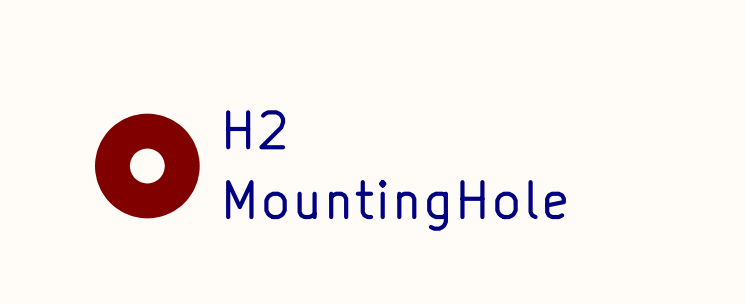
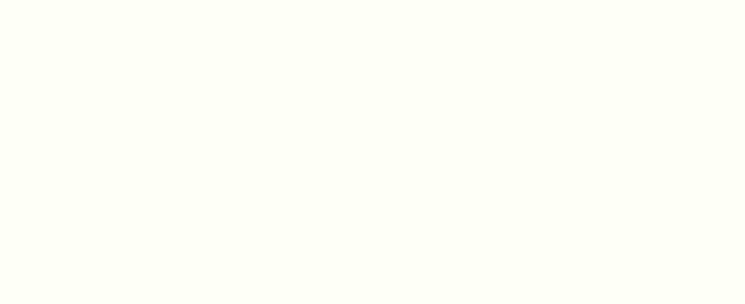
H2: MountingHole (147, 166) -> none

